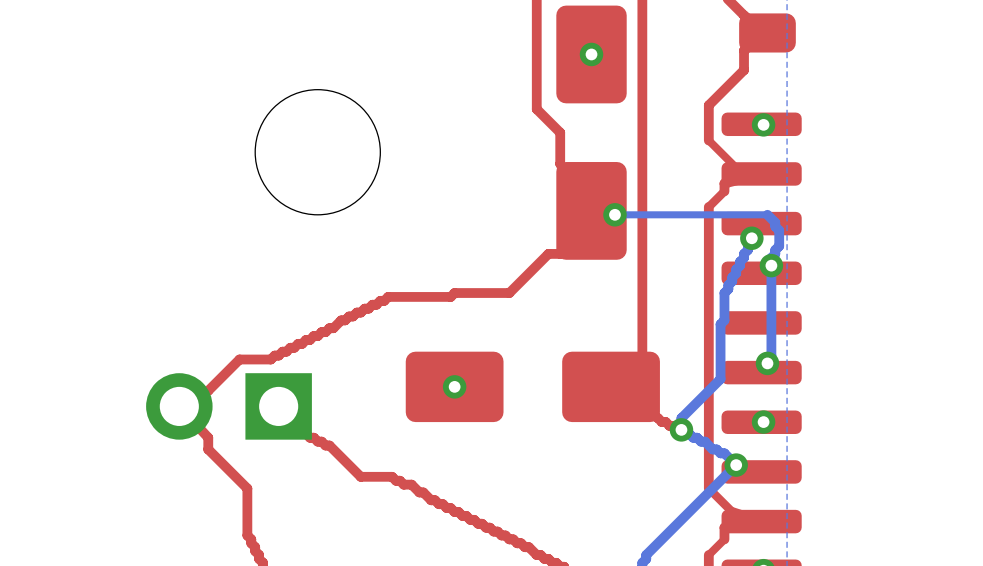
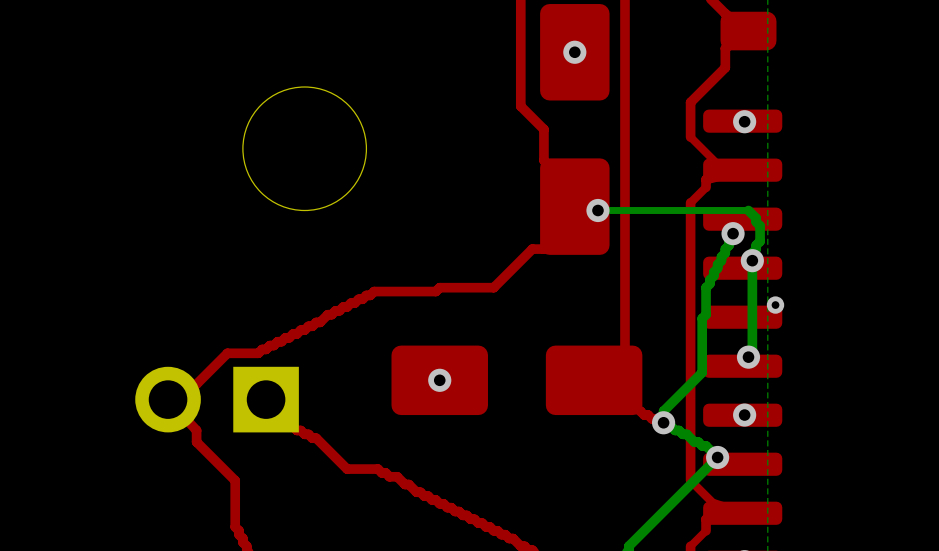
via: none -> (775, 305)

